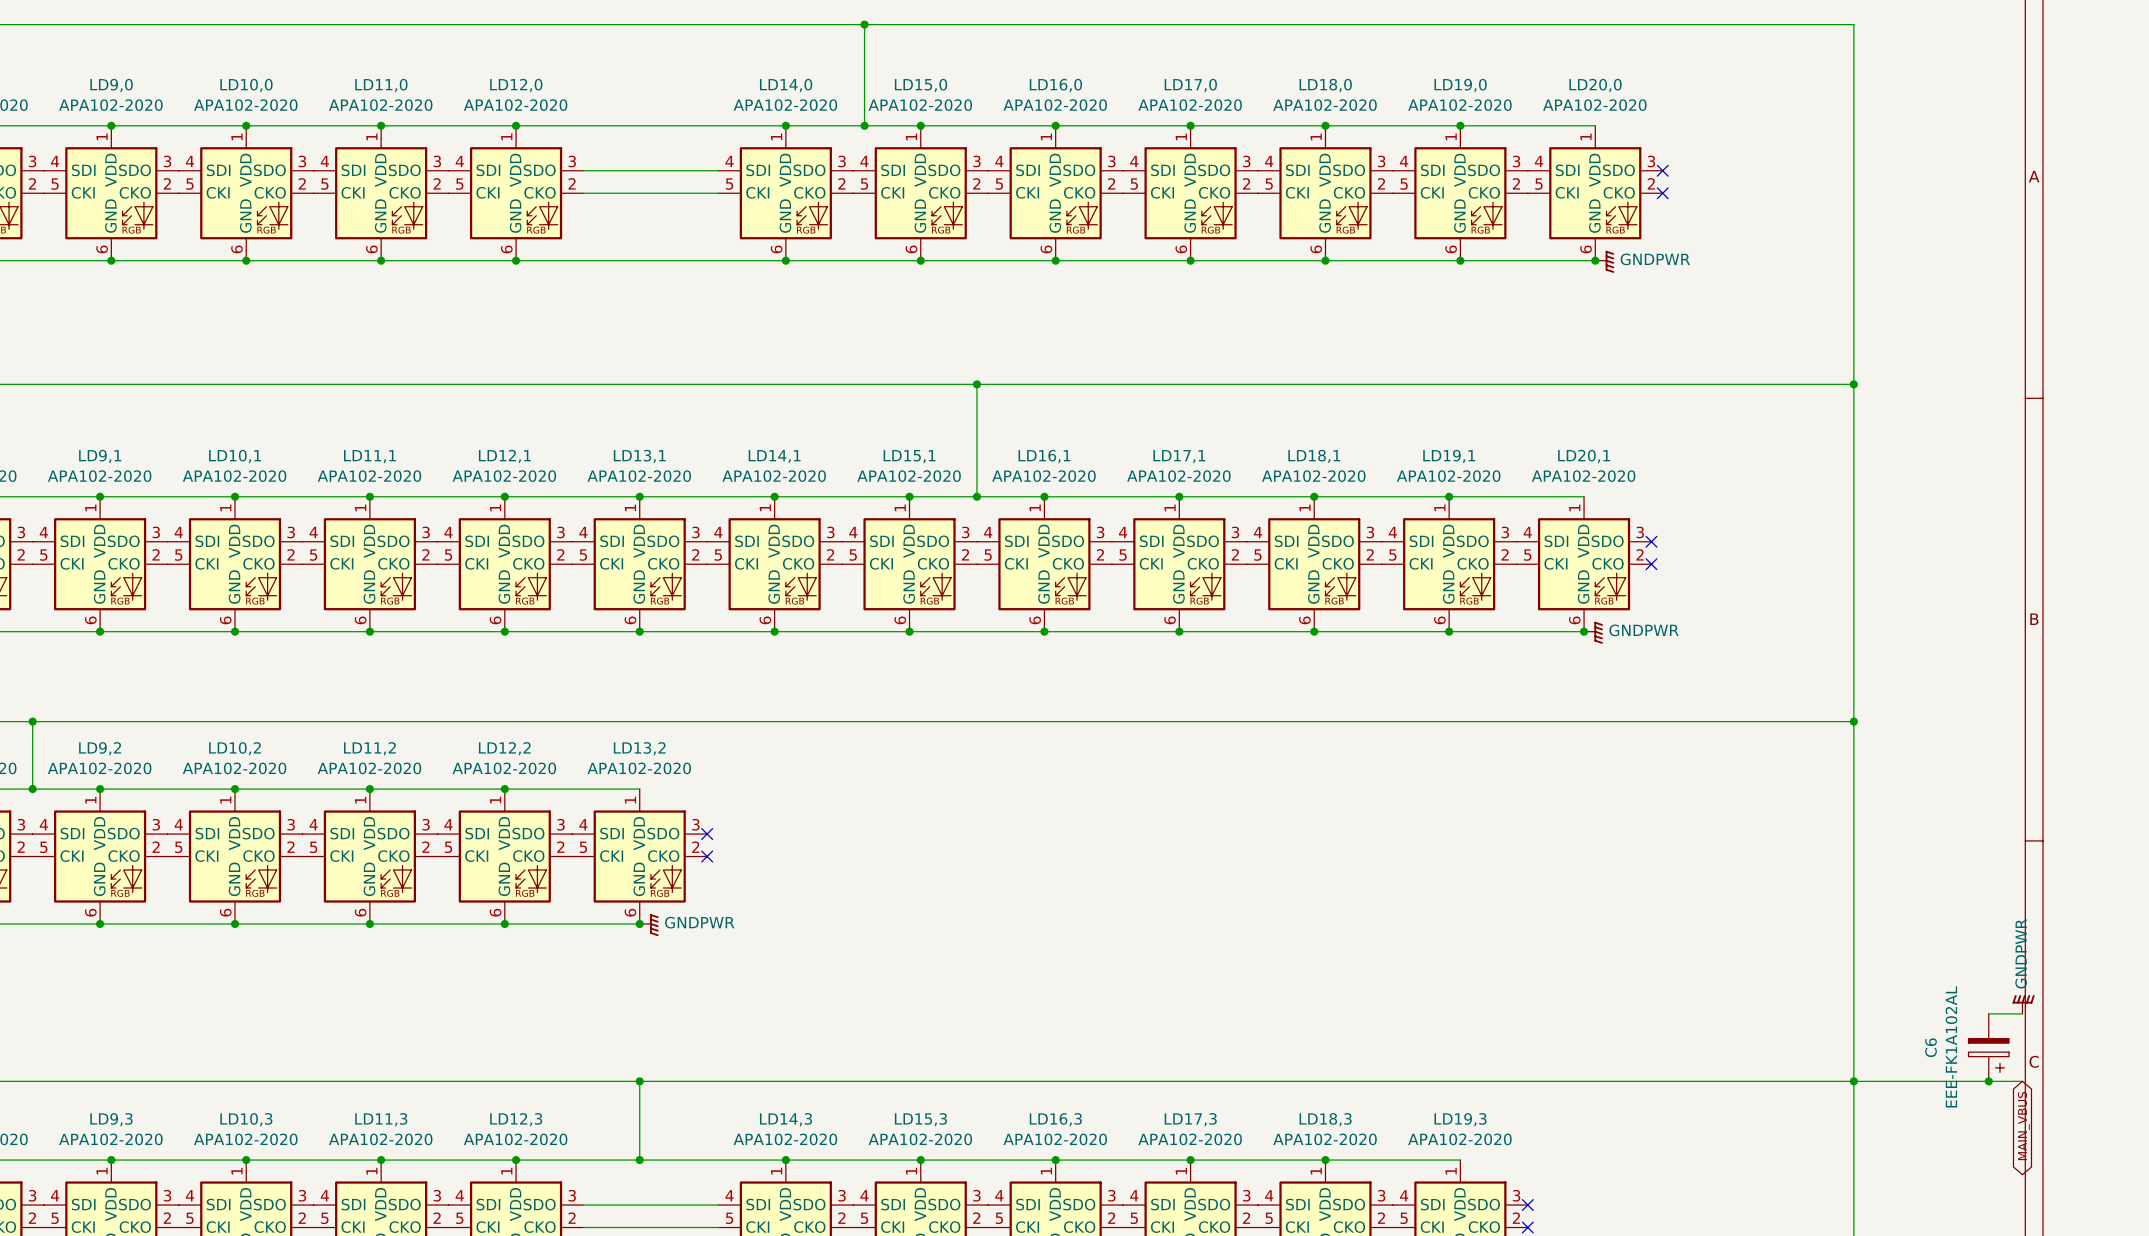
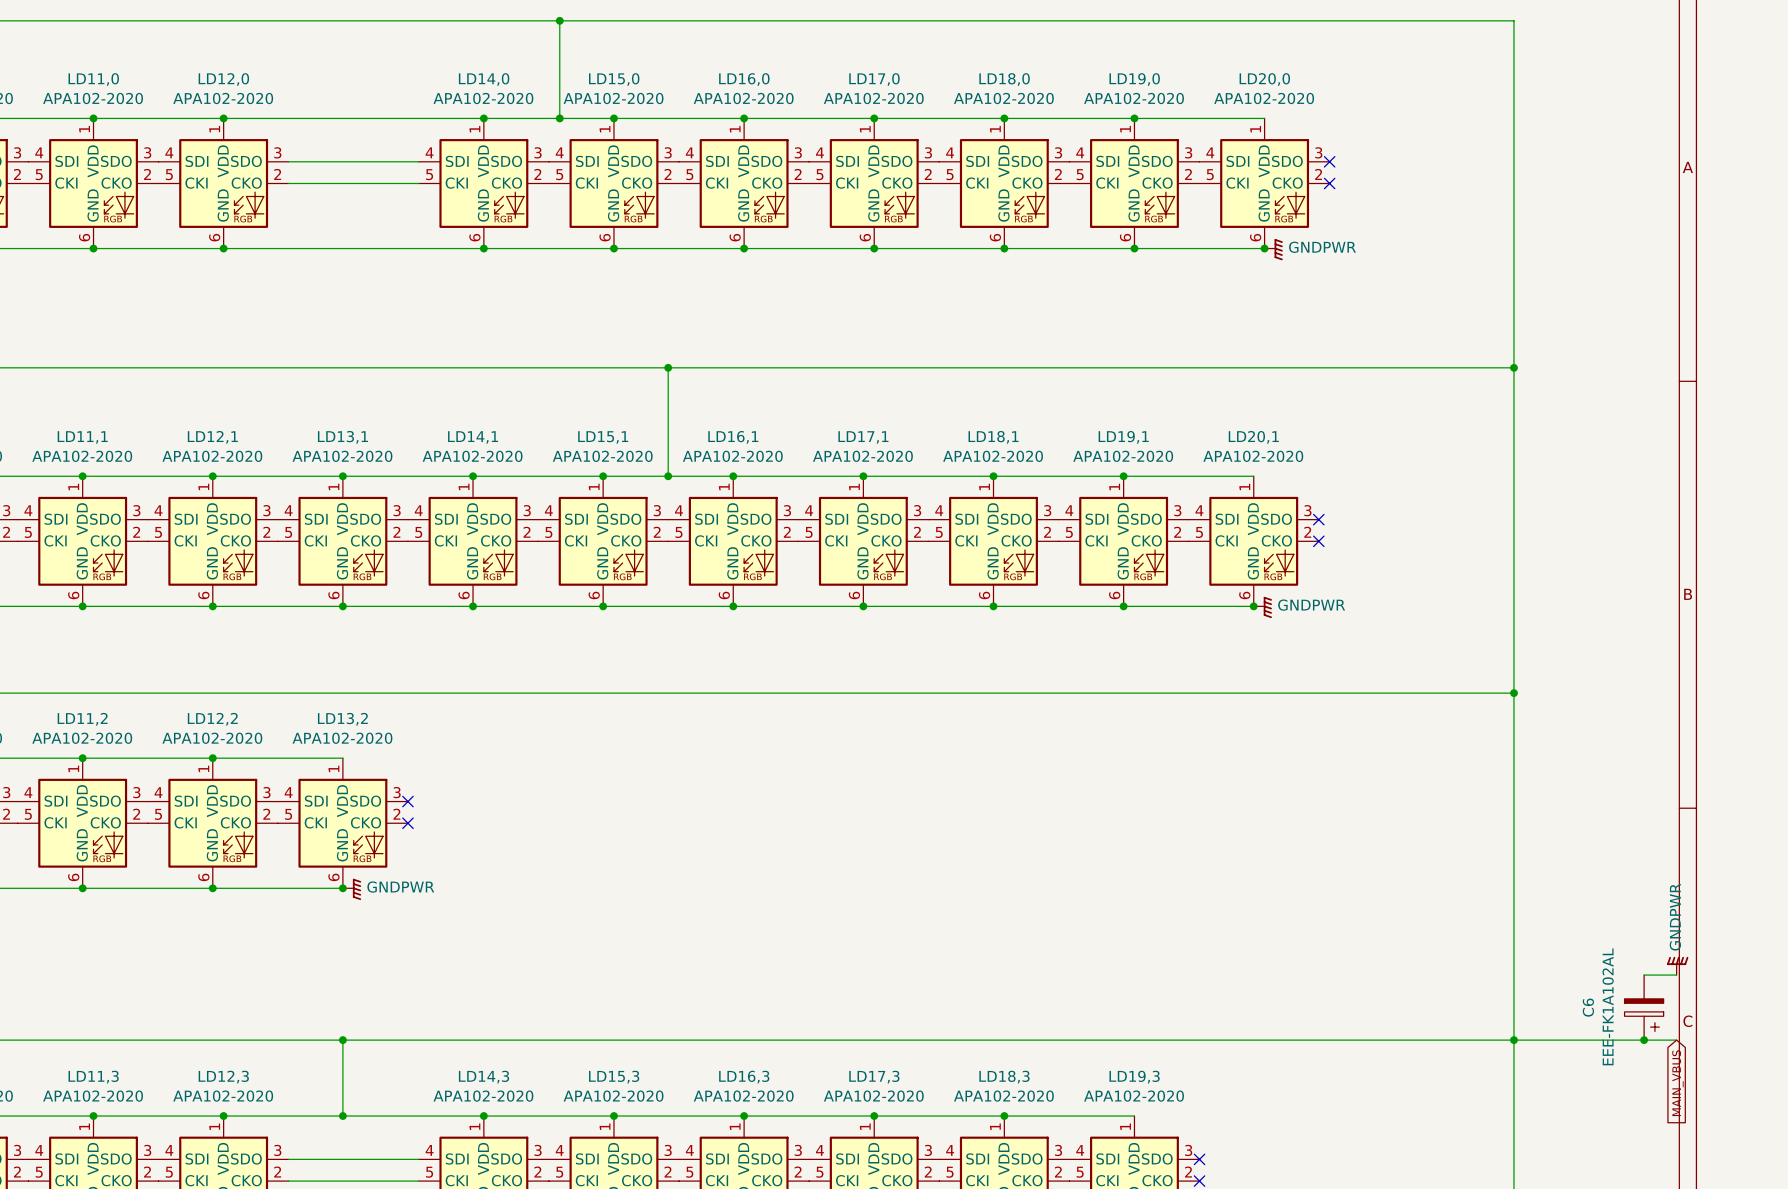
global label shape: bidirectional (2023, 1126) -> input (1677, 1083)

